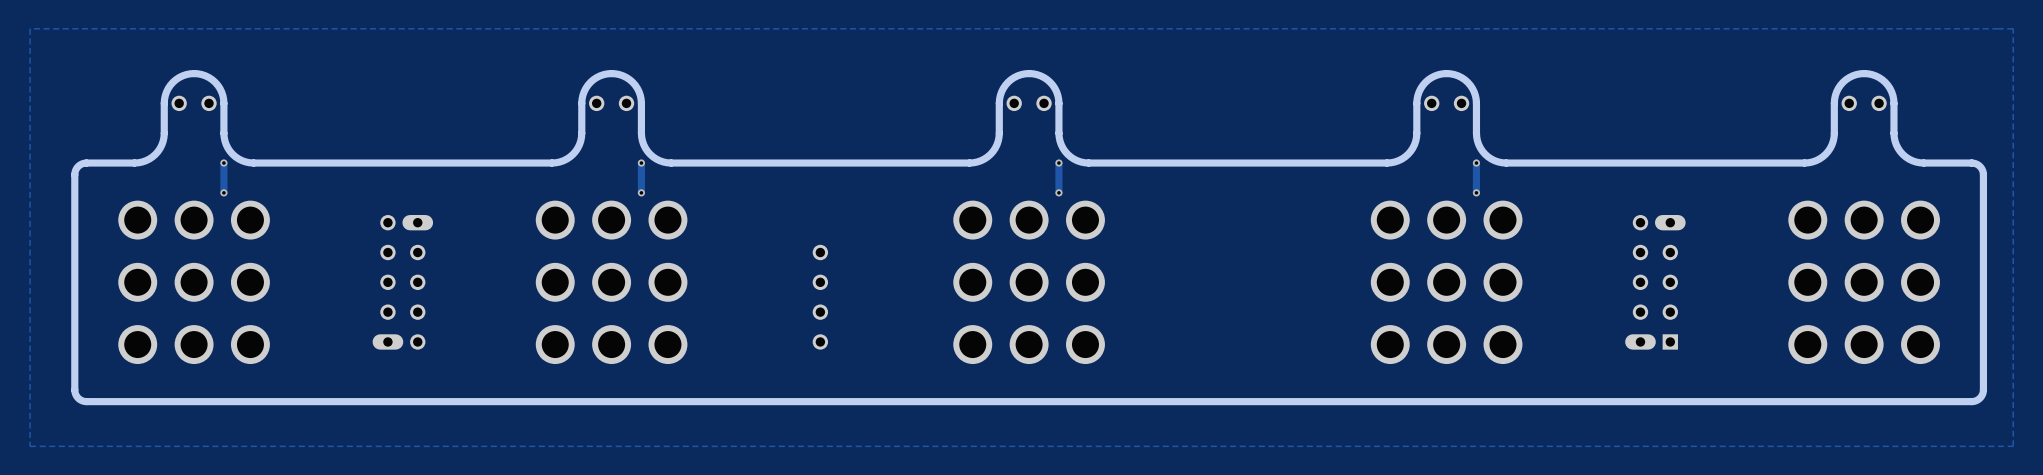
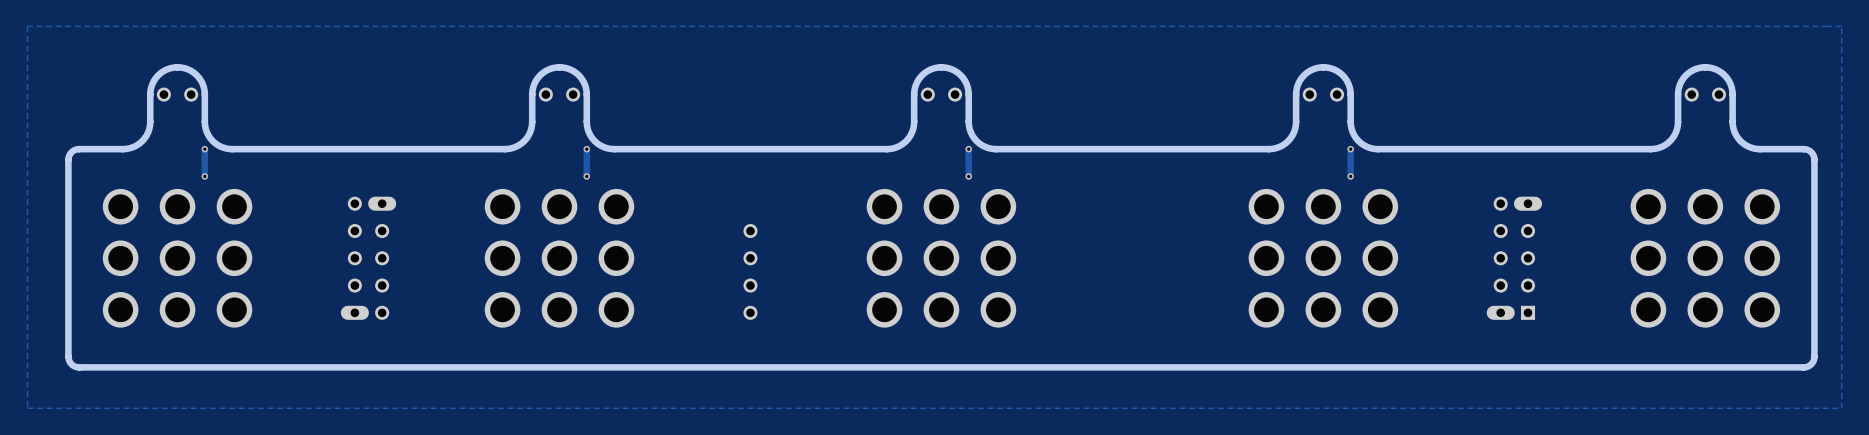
part rotation: 0° (194, 282) -> 90° clockwise (177, 258)
part rotation: 0° (611, 282) -> 90° clockwise (559, 258)
part rotation: 0° (1029, 282) -> 90° clockwise (941, 258)
part rotation: 0° (1446, 282) -> 90° clockwise (1323, 258)
part rotation: 0° (1864, 282) -> 90° clockwise (1705, 258)

